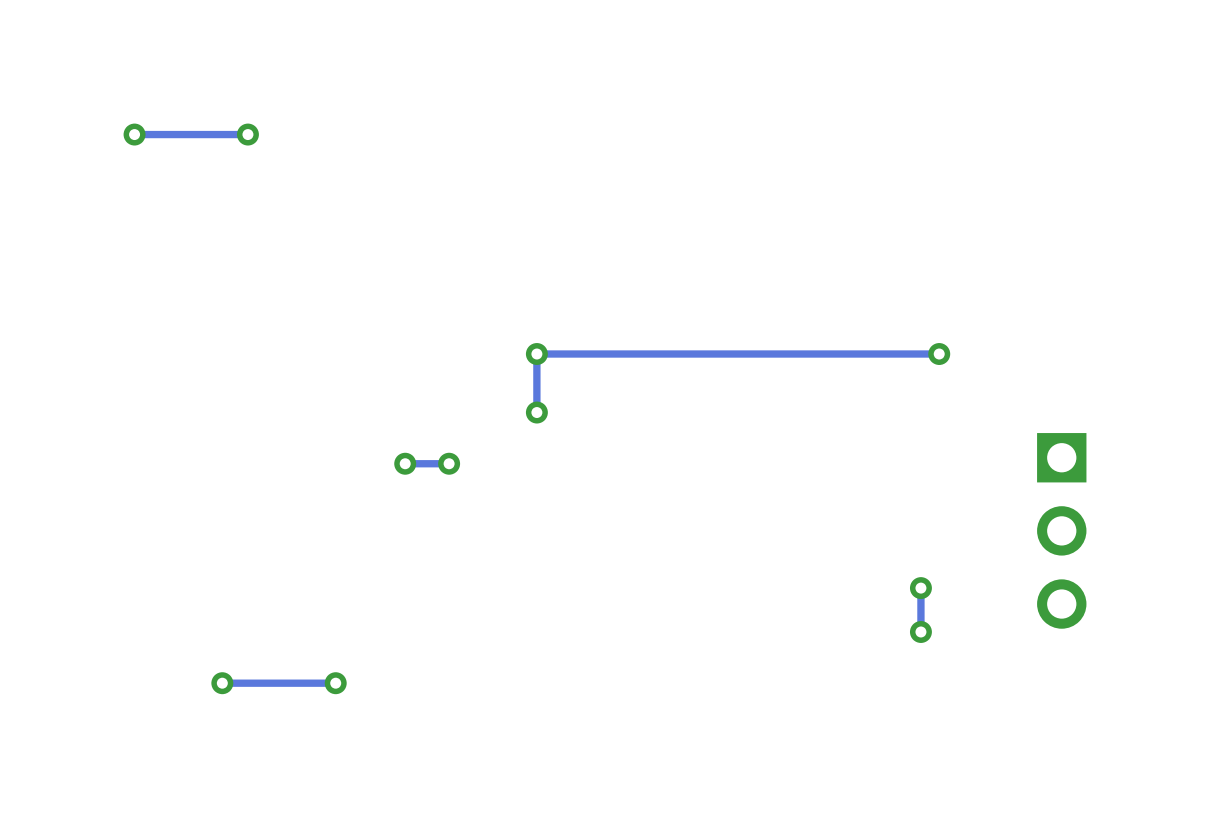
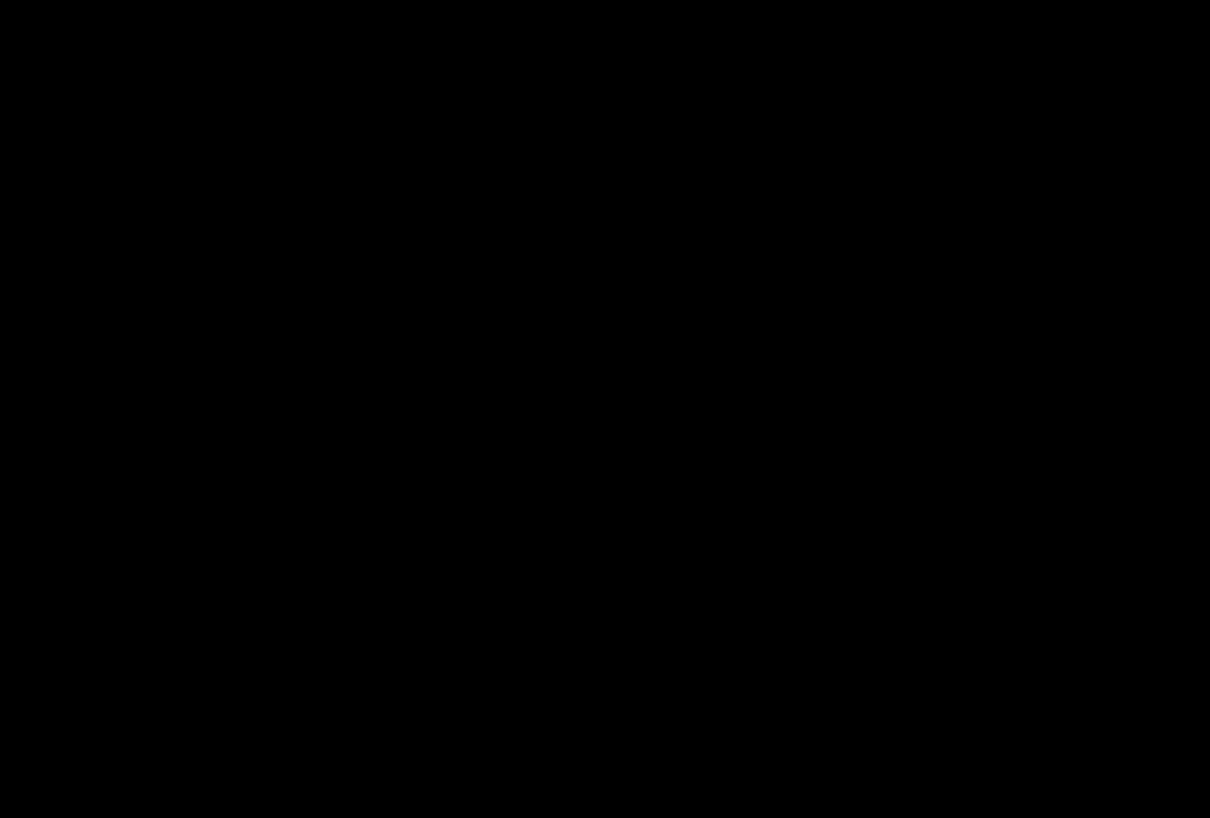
via: (134, 134) -> none
track: (247, 134) (134, 134) -> none
via: (247, 134) -> none
via: (536, 354) -> none
track: (939, 354) (536, 354) (536, 412) -> none
via: (939, 354) -> none
via: (536, 412) -> none
via: (405, 463) -> none
track: (449, 463) (405, 463) -> none
via: (449, 463) -> none
part: (1061, 530) -> none
track: (920, 588) (920, 631) -> none
via: (920, 588) -> none
via: (920, 631) -> none
via: (222, 683) -> none
track: (335, 683) (222, 683) -> none
via: (335, 683) -> none

